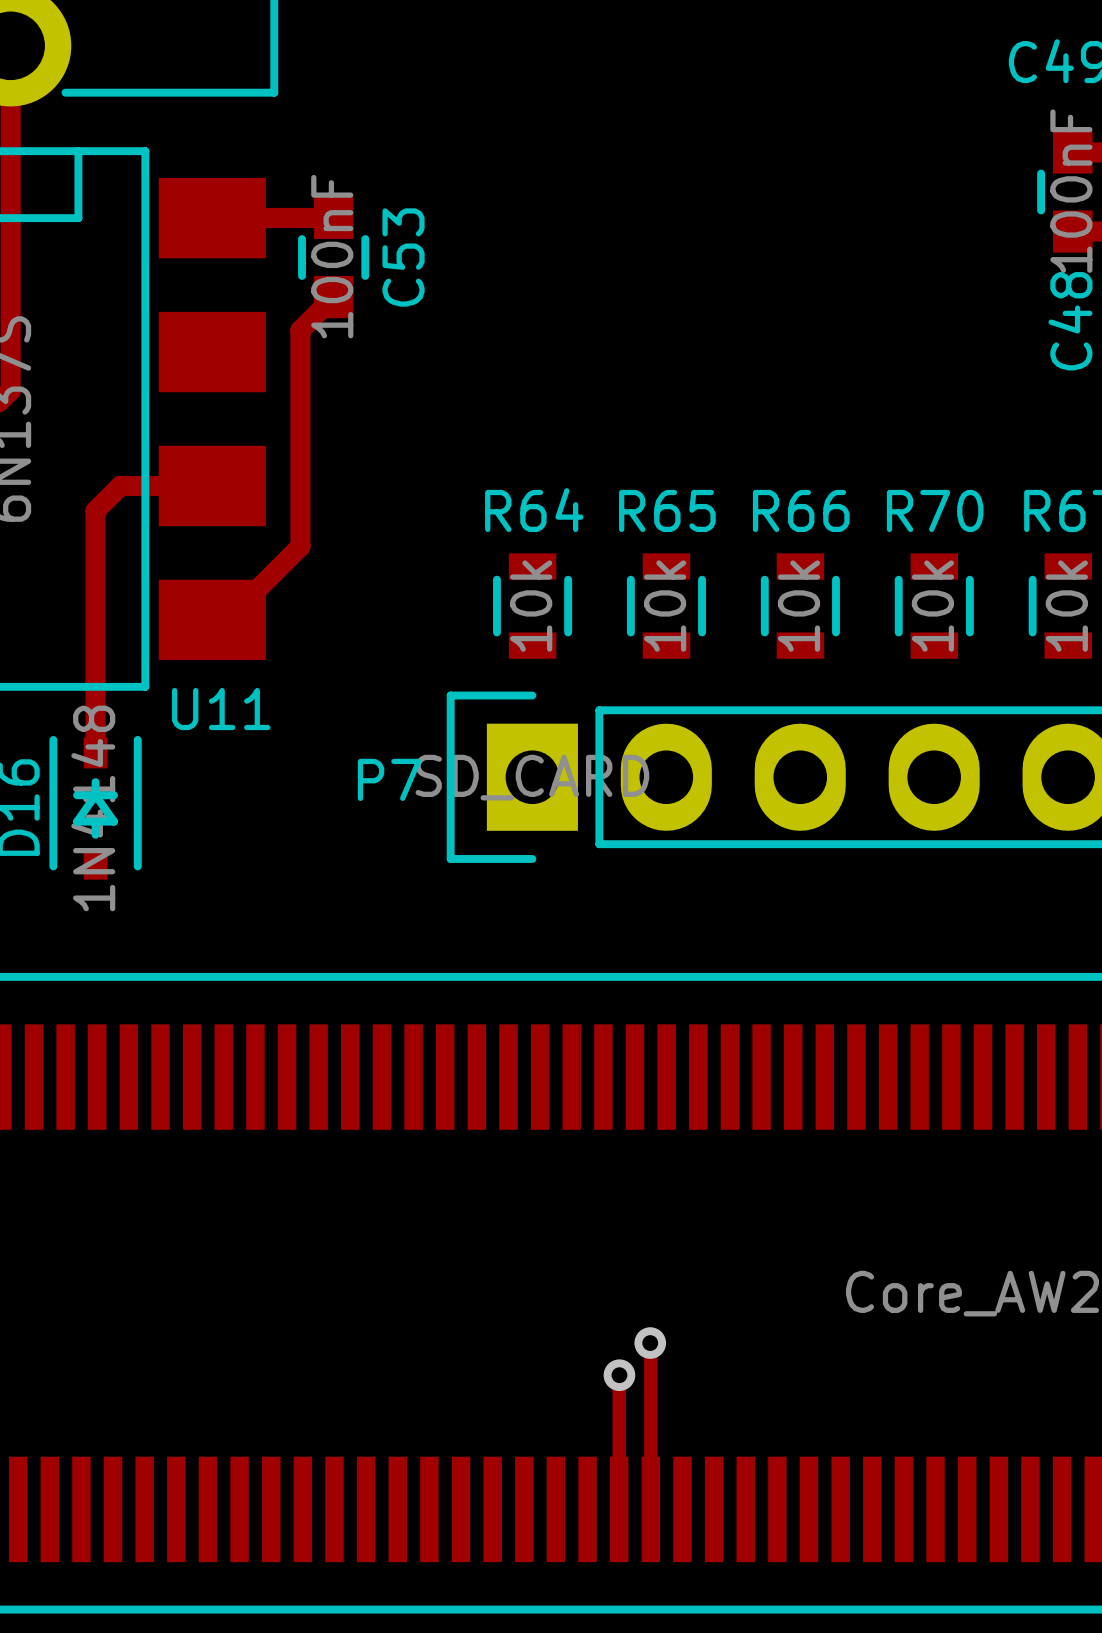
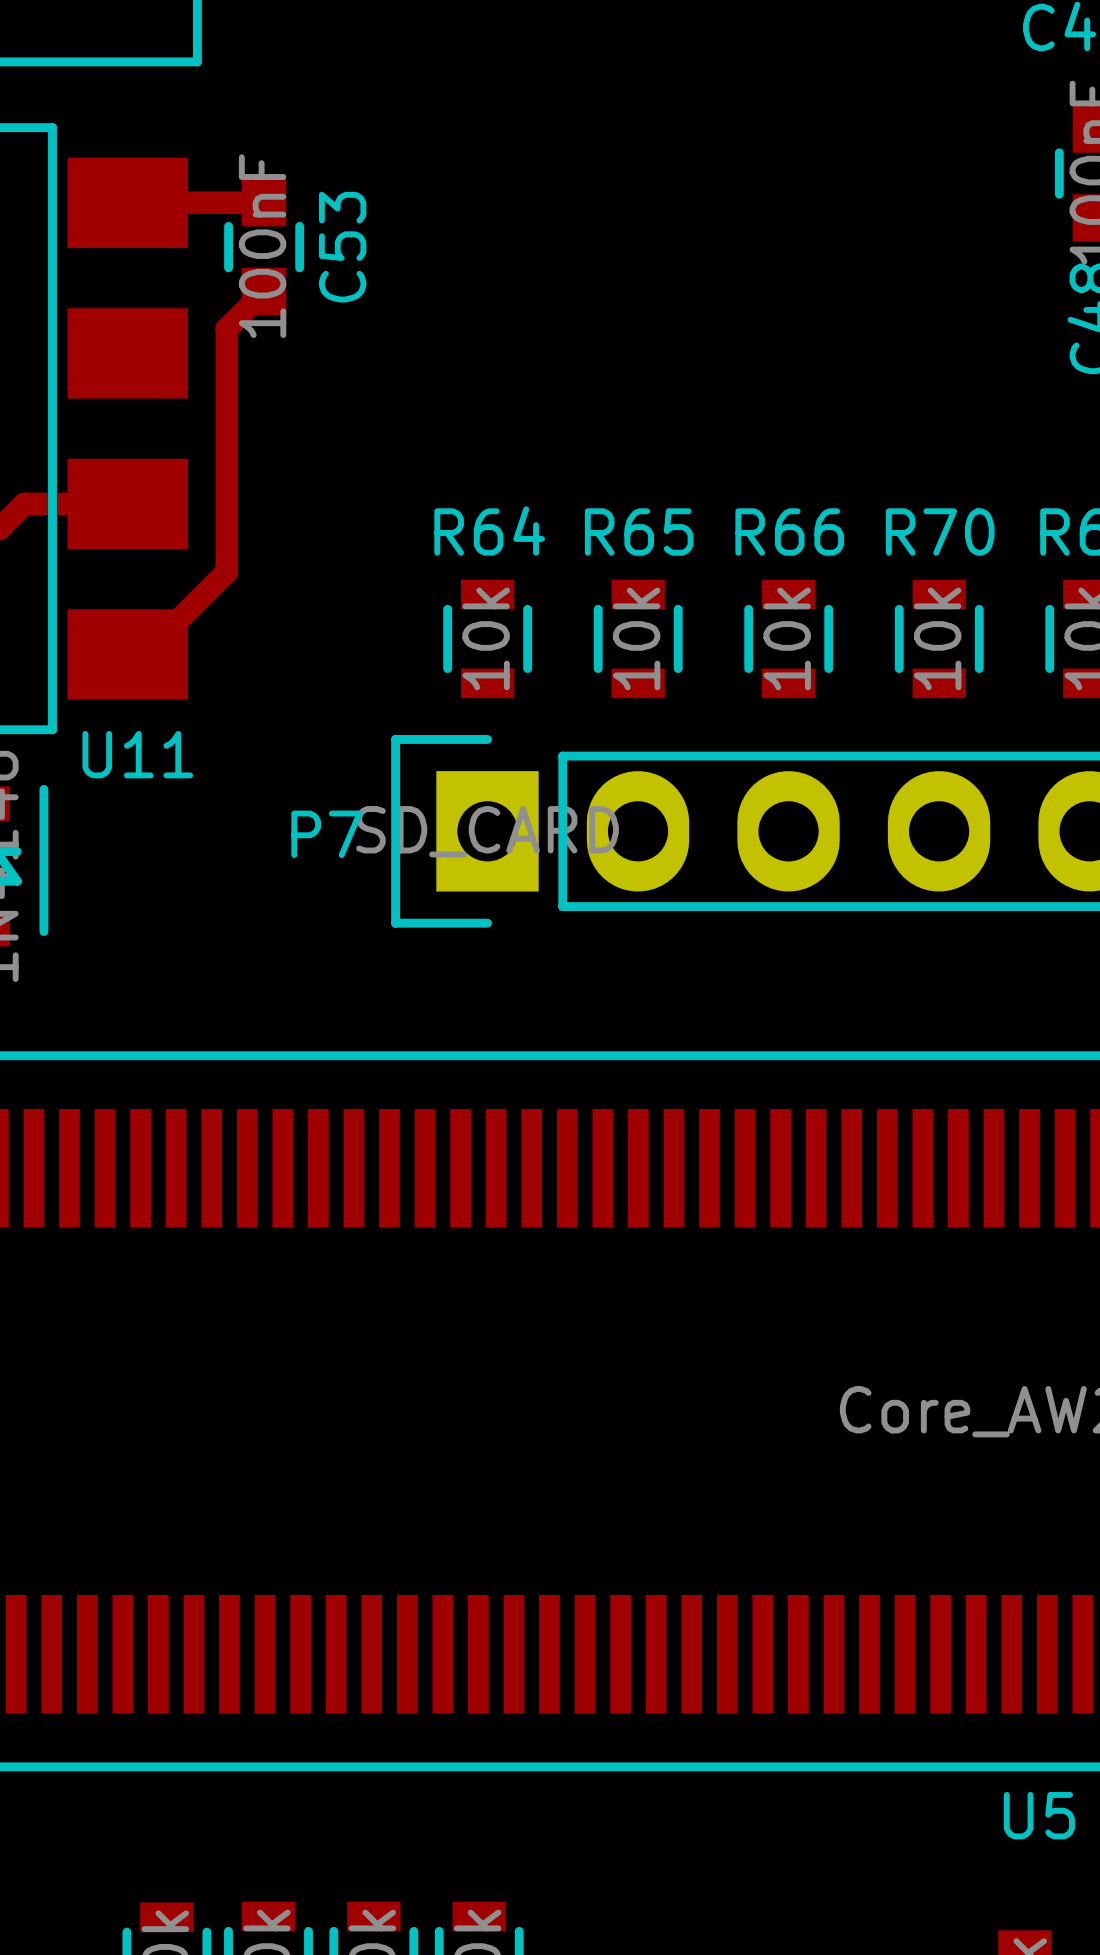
track: (650, 1343) (650, 1509) -> none
via: (650, 1343) -> none
track: (619, 1375) (619, 1509) -> none
via: (619, 1375) -> none

